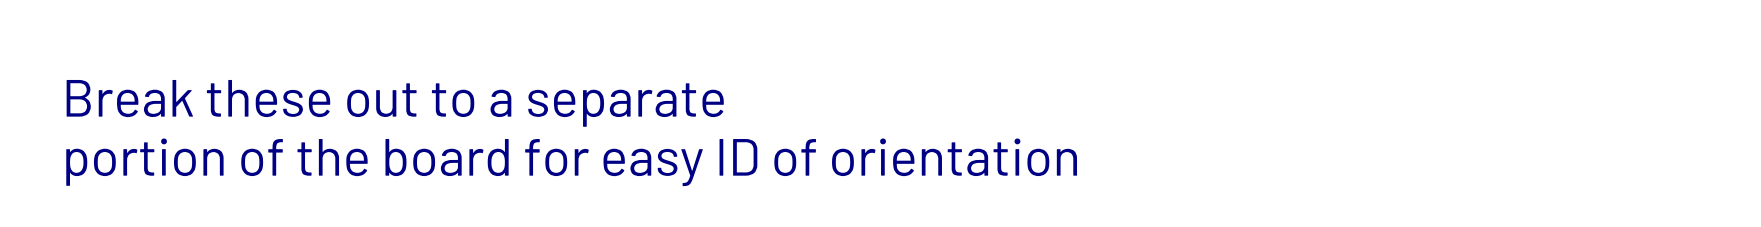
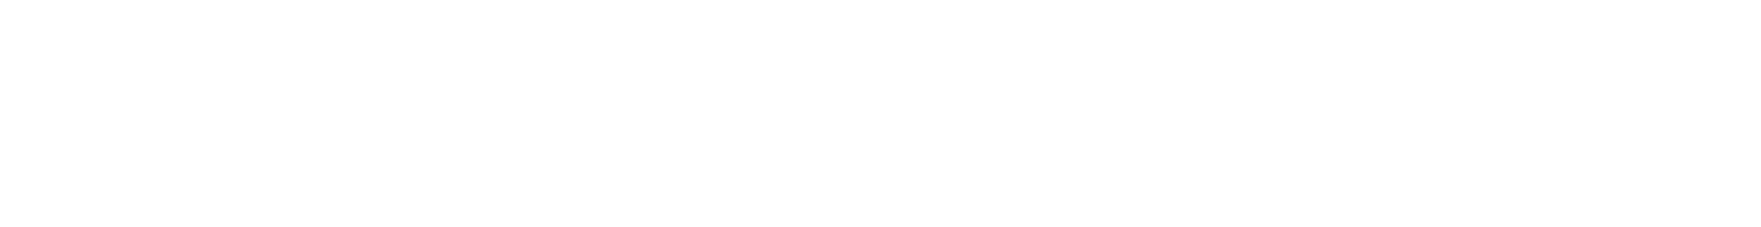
text: Break these out to a separate (395, 103) -> none
text: portion of the board for easy ID of orientation (571, 162) -> none

